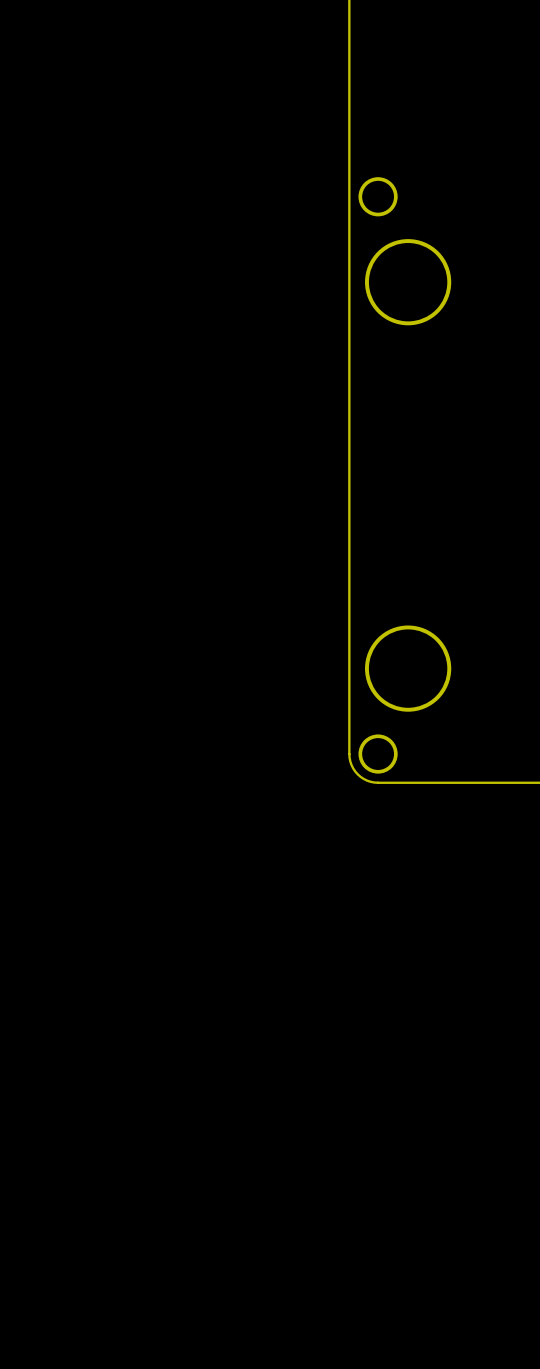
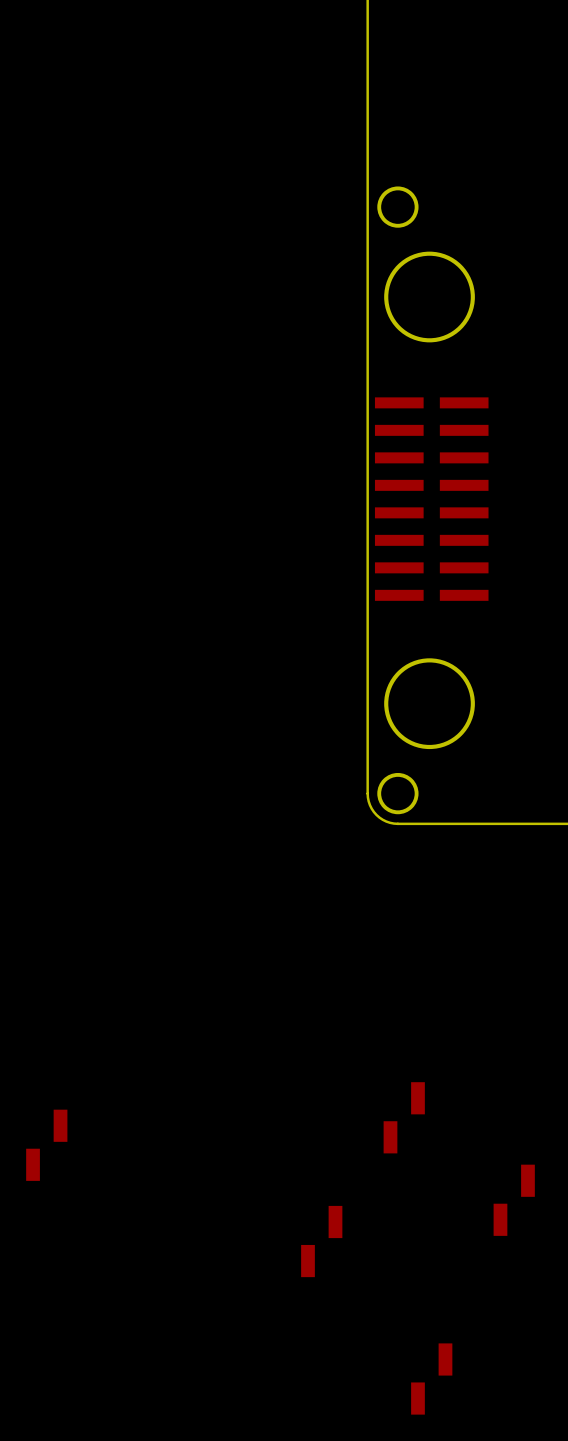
part: none -> (431, 499)
part: none -> (404, 1117)
part: none -> (46, 1145)
part: none -> (514, 1200)
part: none -> (321, 1241)
part: none -> (431, 1379)

